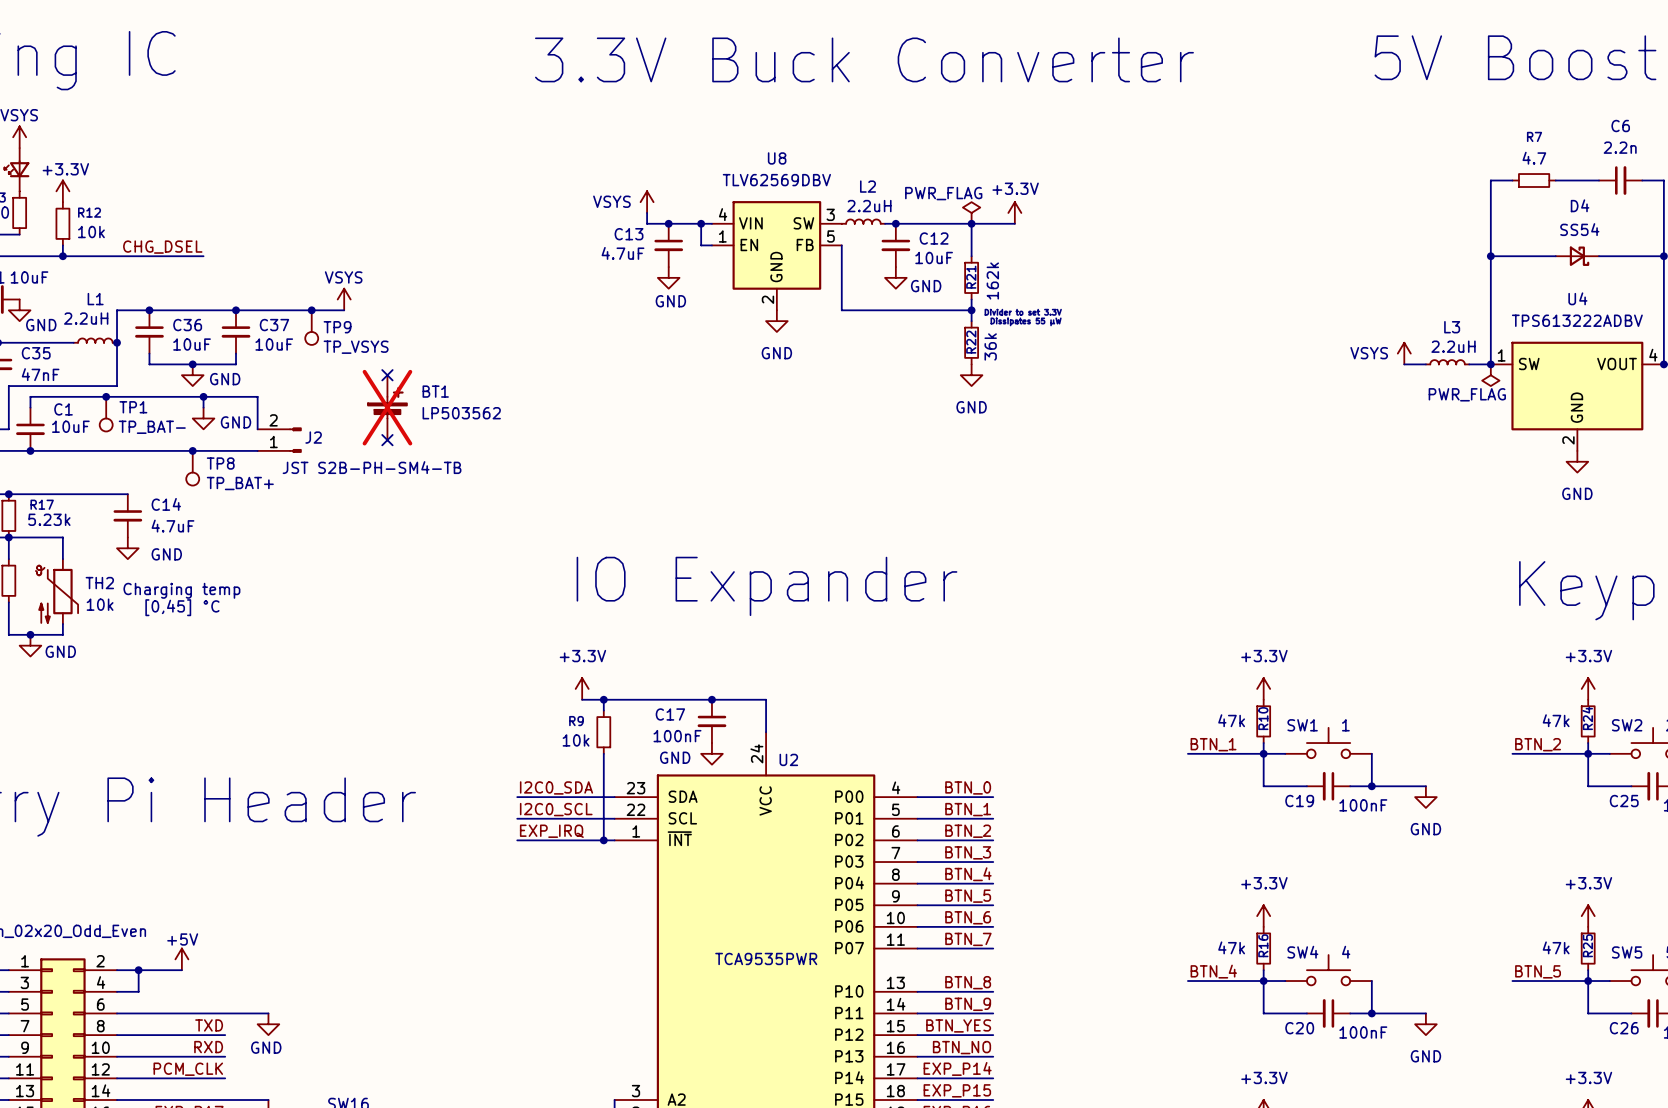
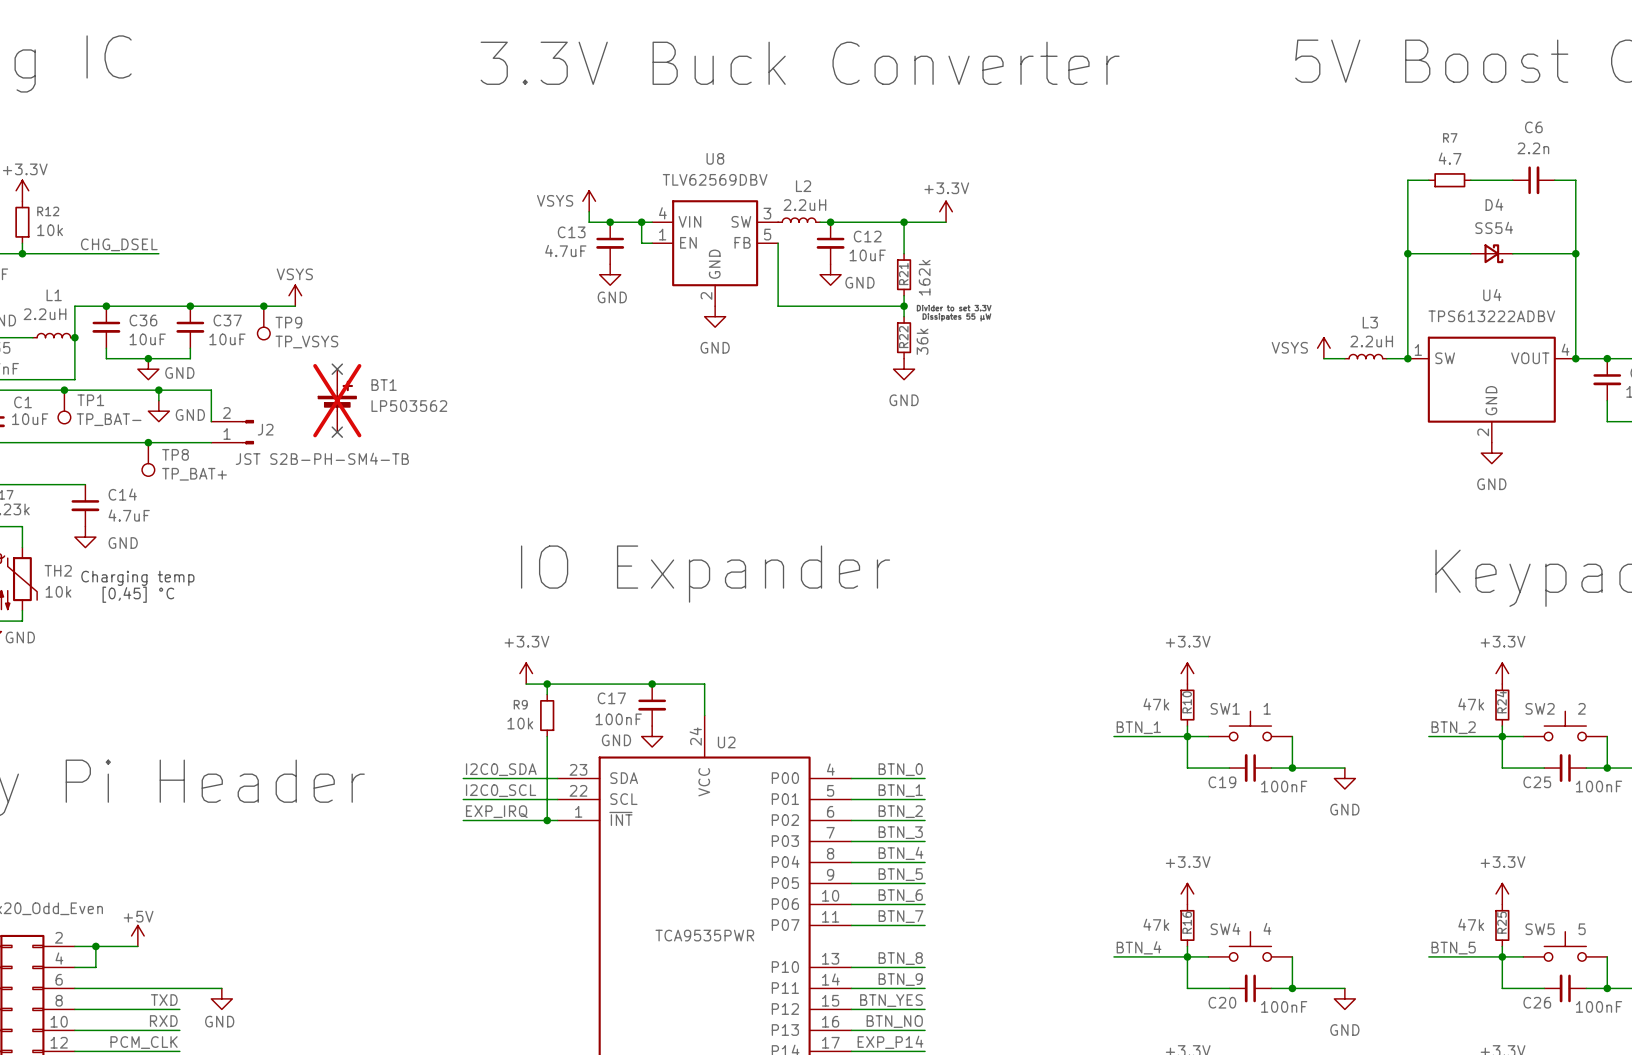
power symbol: PWR_FLAG (971, 212) -> none
power symbol: PWR_FLAG (1490, 375) -> none

